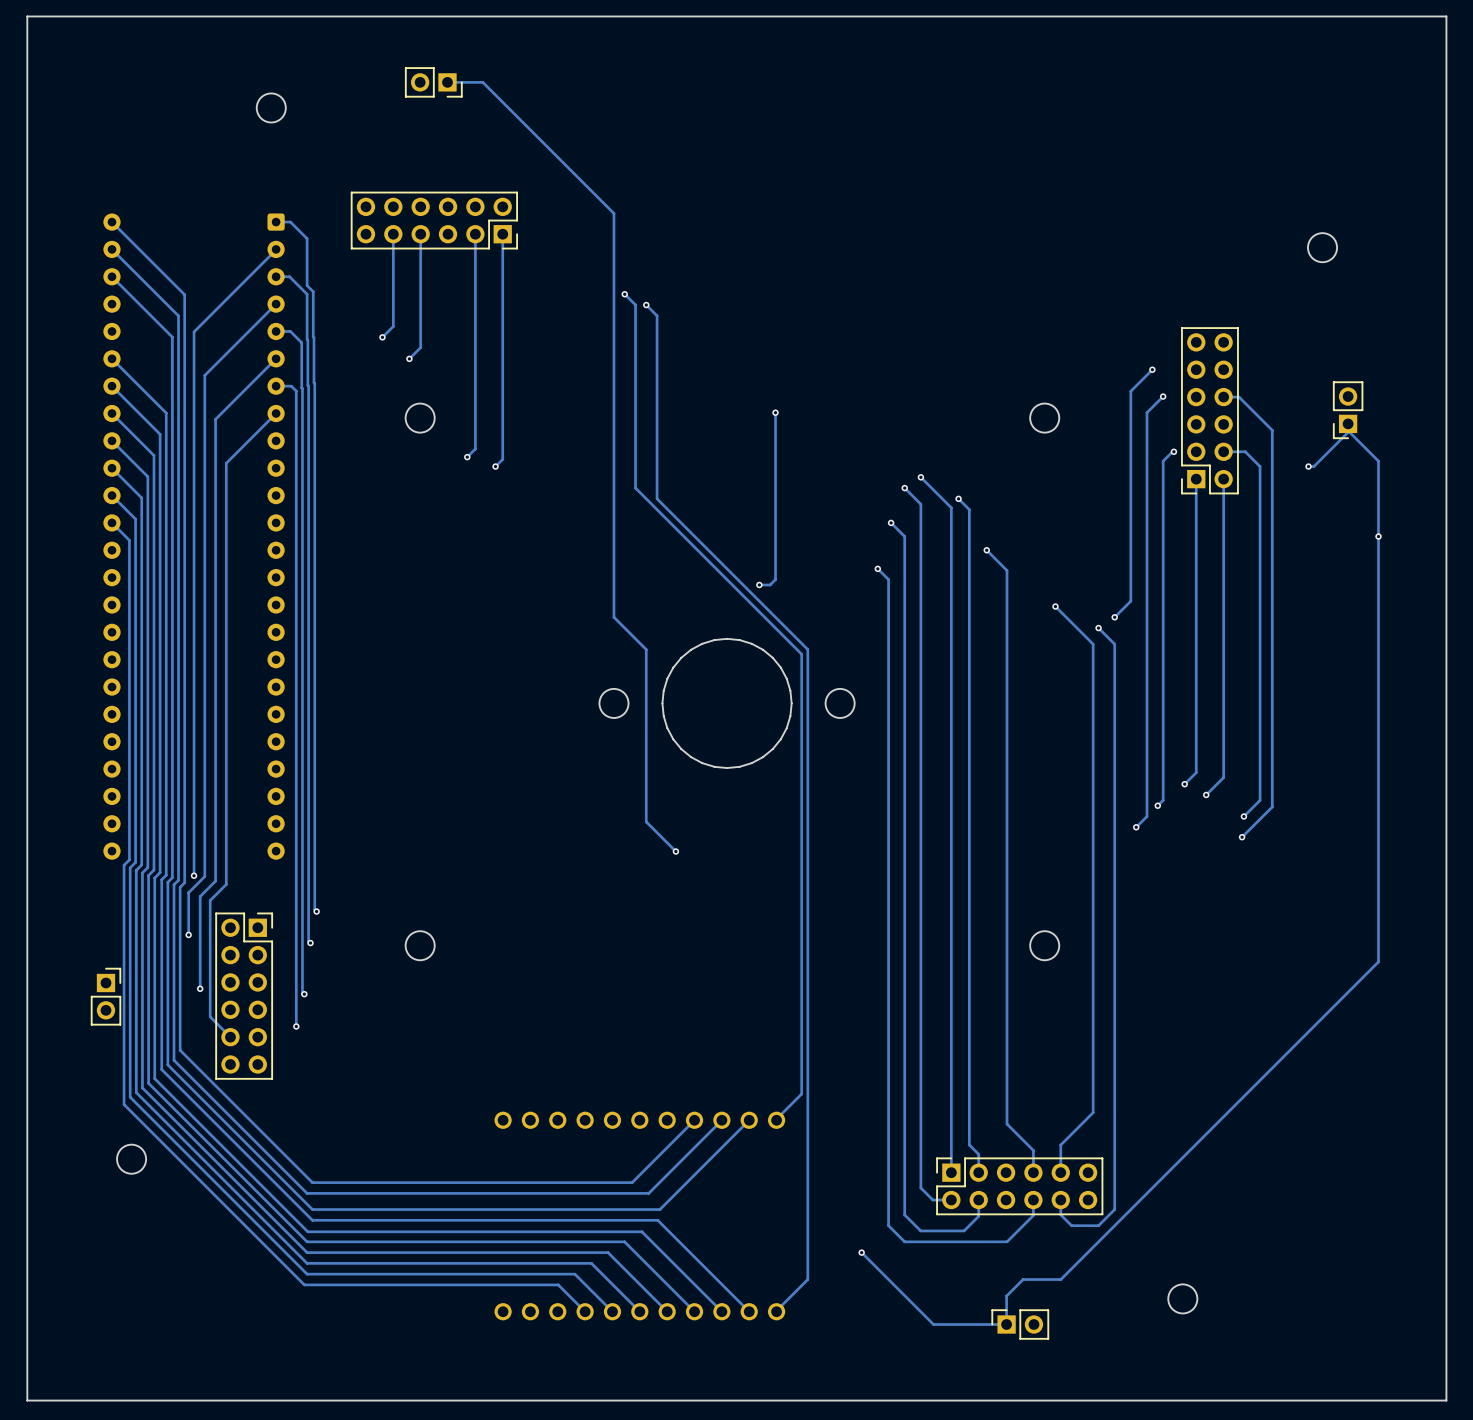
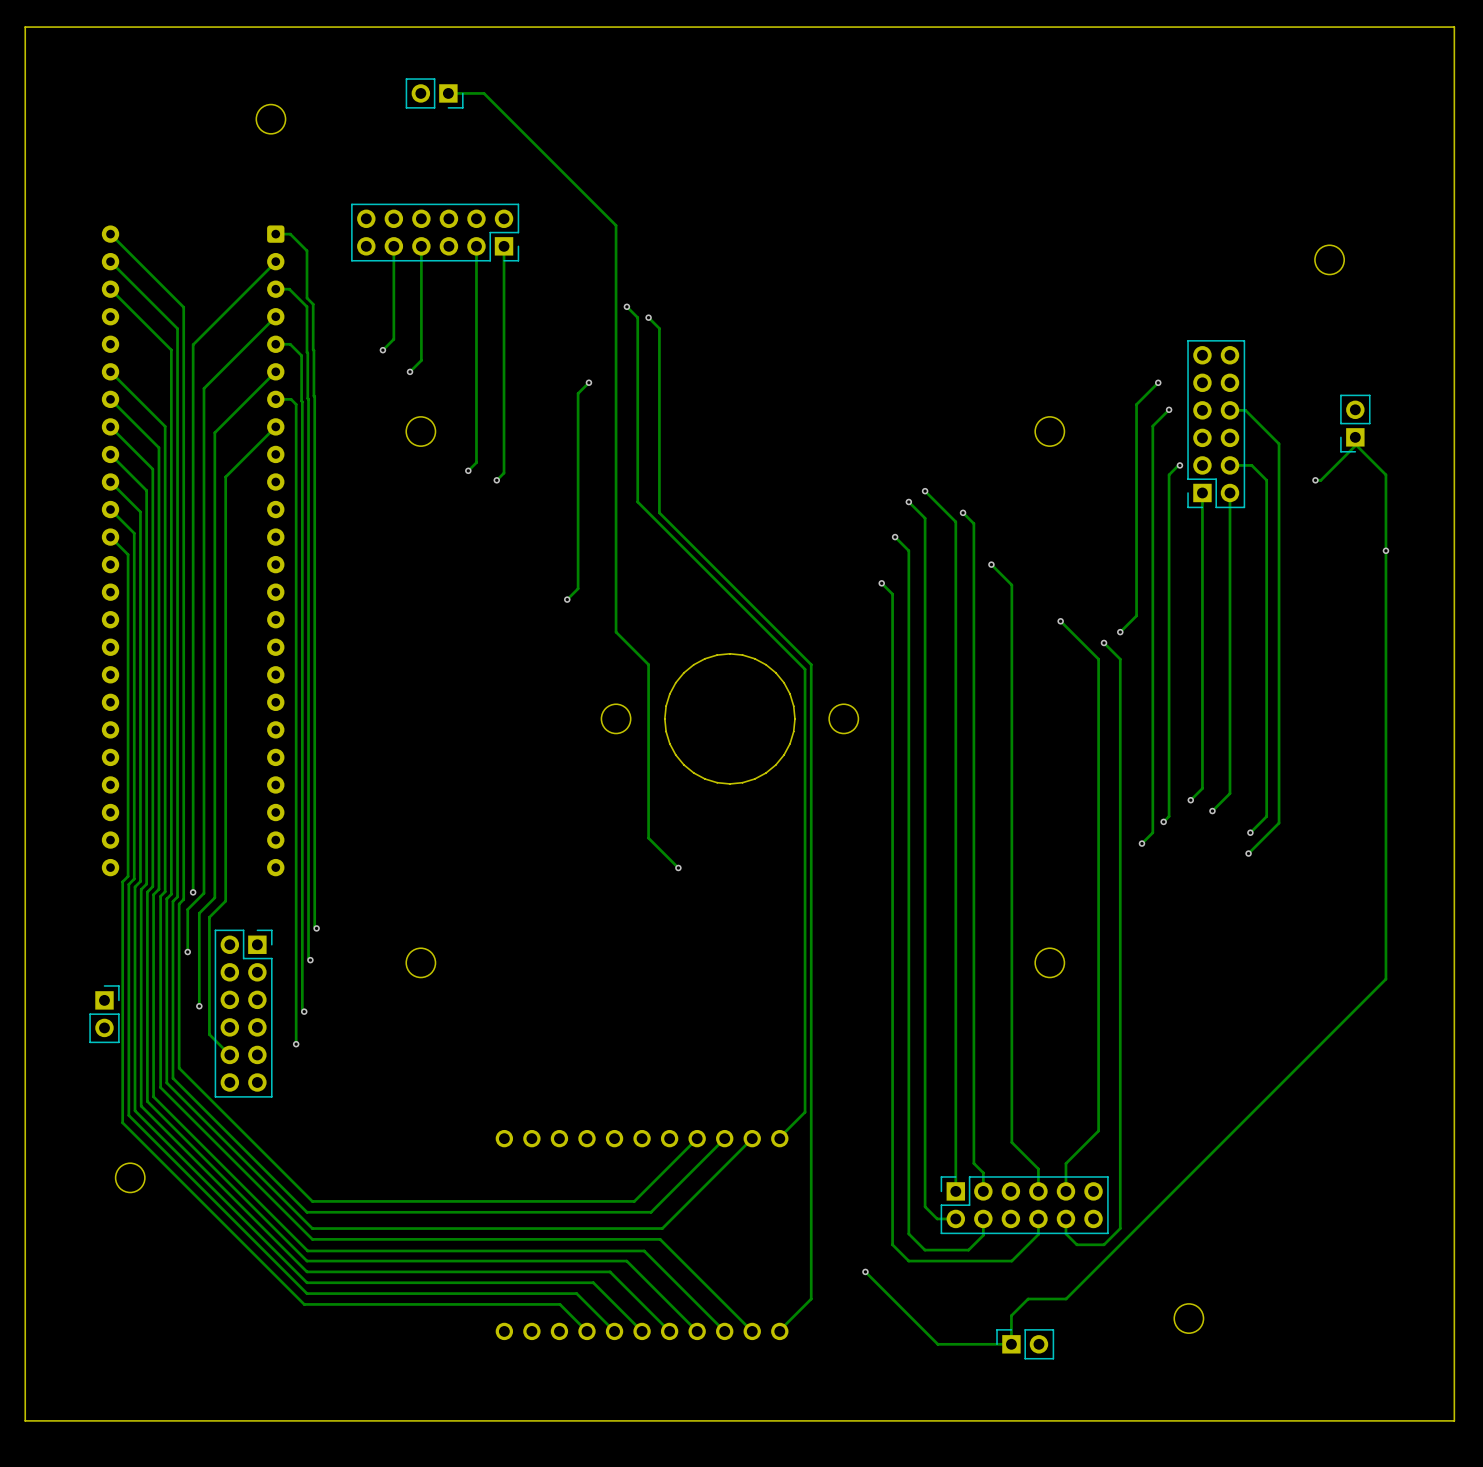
track: none -> (588, 382) (578, 393) (578, 588) (567, 599)
via: none -> (588, 382)
track: (775, 412) (775, 579) (770, 585) (759, 585) -> none
via: (775, 412) -> none
via: none -> (567, 599)
via: (759, 585) -> none

